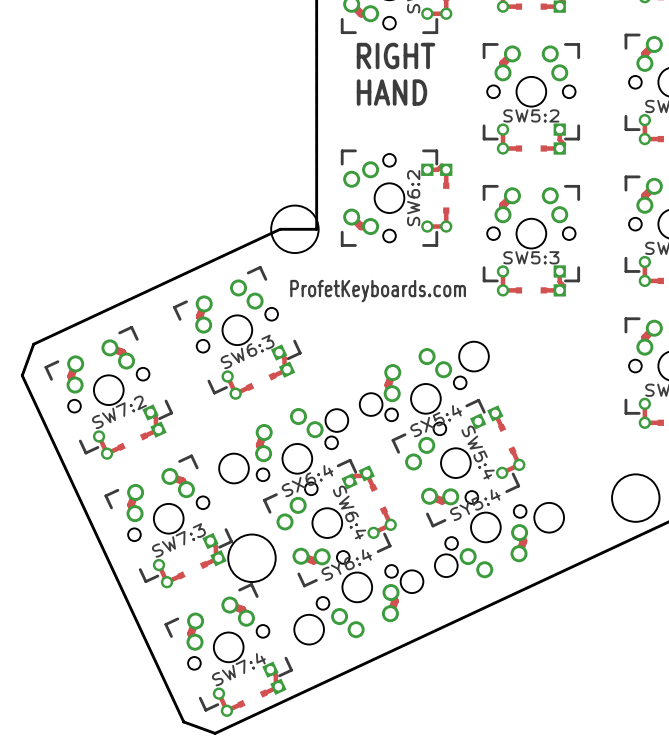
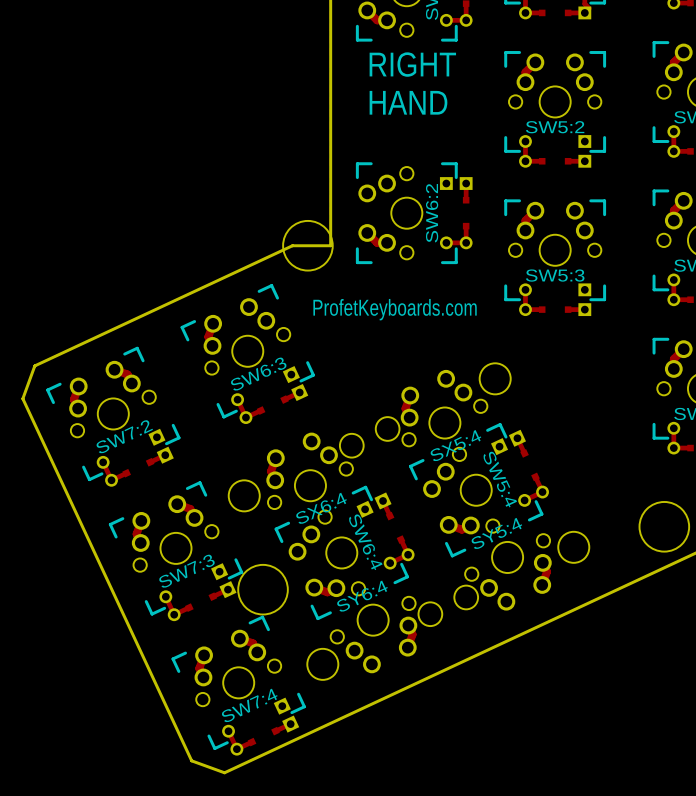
track: (559, 129) (559, 139) (564, 144) -> none
track: (441, 165) (437, 169) (427, 169) -> none
track: (559, 271) (559, 281) (564, 286) -> none
track: (279, 352) (284, 357) (284, 364) -> none
track: (150, 412) (155, 417) (155, 424) -> none
track: (361, 475) (355, 475) (349, 481) -> none
track: (210, 541) (215, 546) (215, 552) -> none
track: (270, 669) (275, 675) (275, 681) -> none

